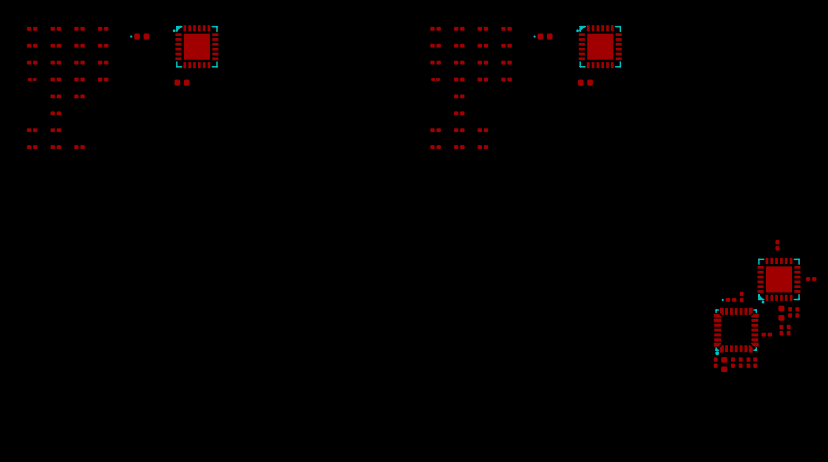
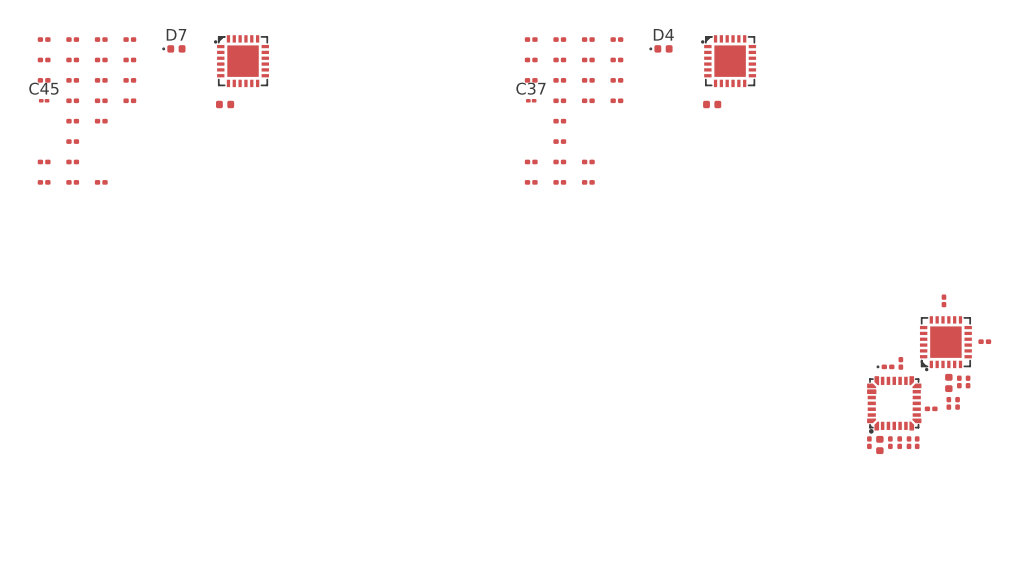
D7 name: none -> D7 (176, 34)
D4 name: none -> D4 (663, 34)
C45 name: none -> C45 (43, 88)
C37 name: none -> C37 (530, 88)

